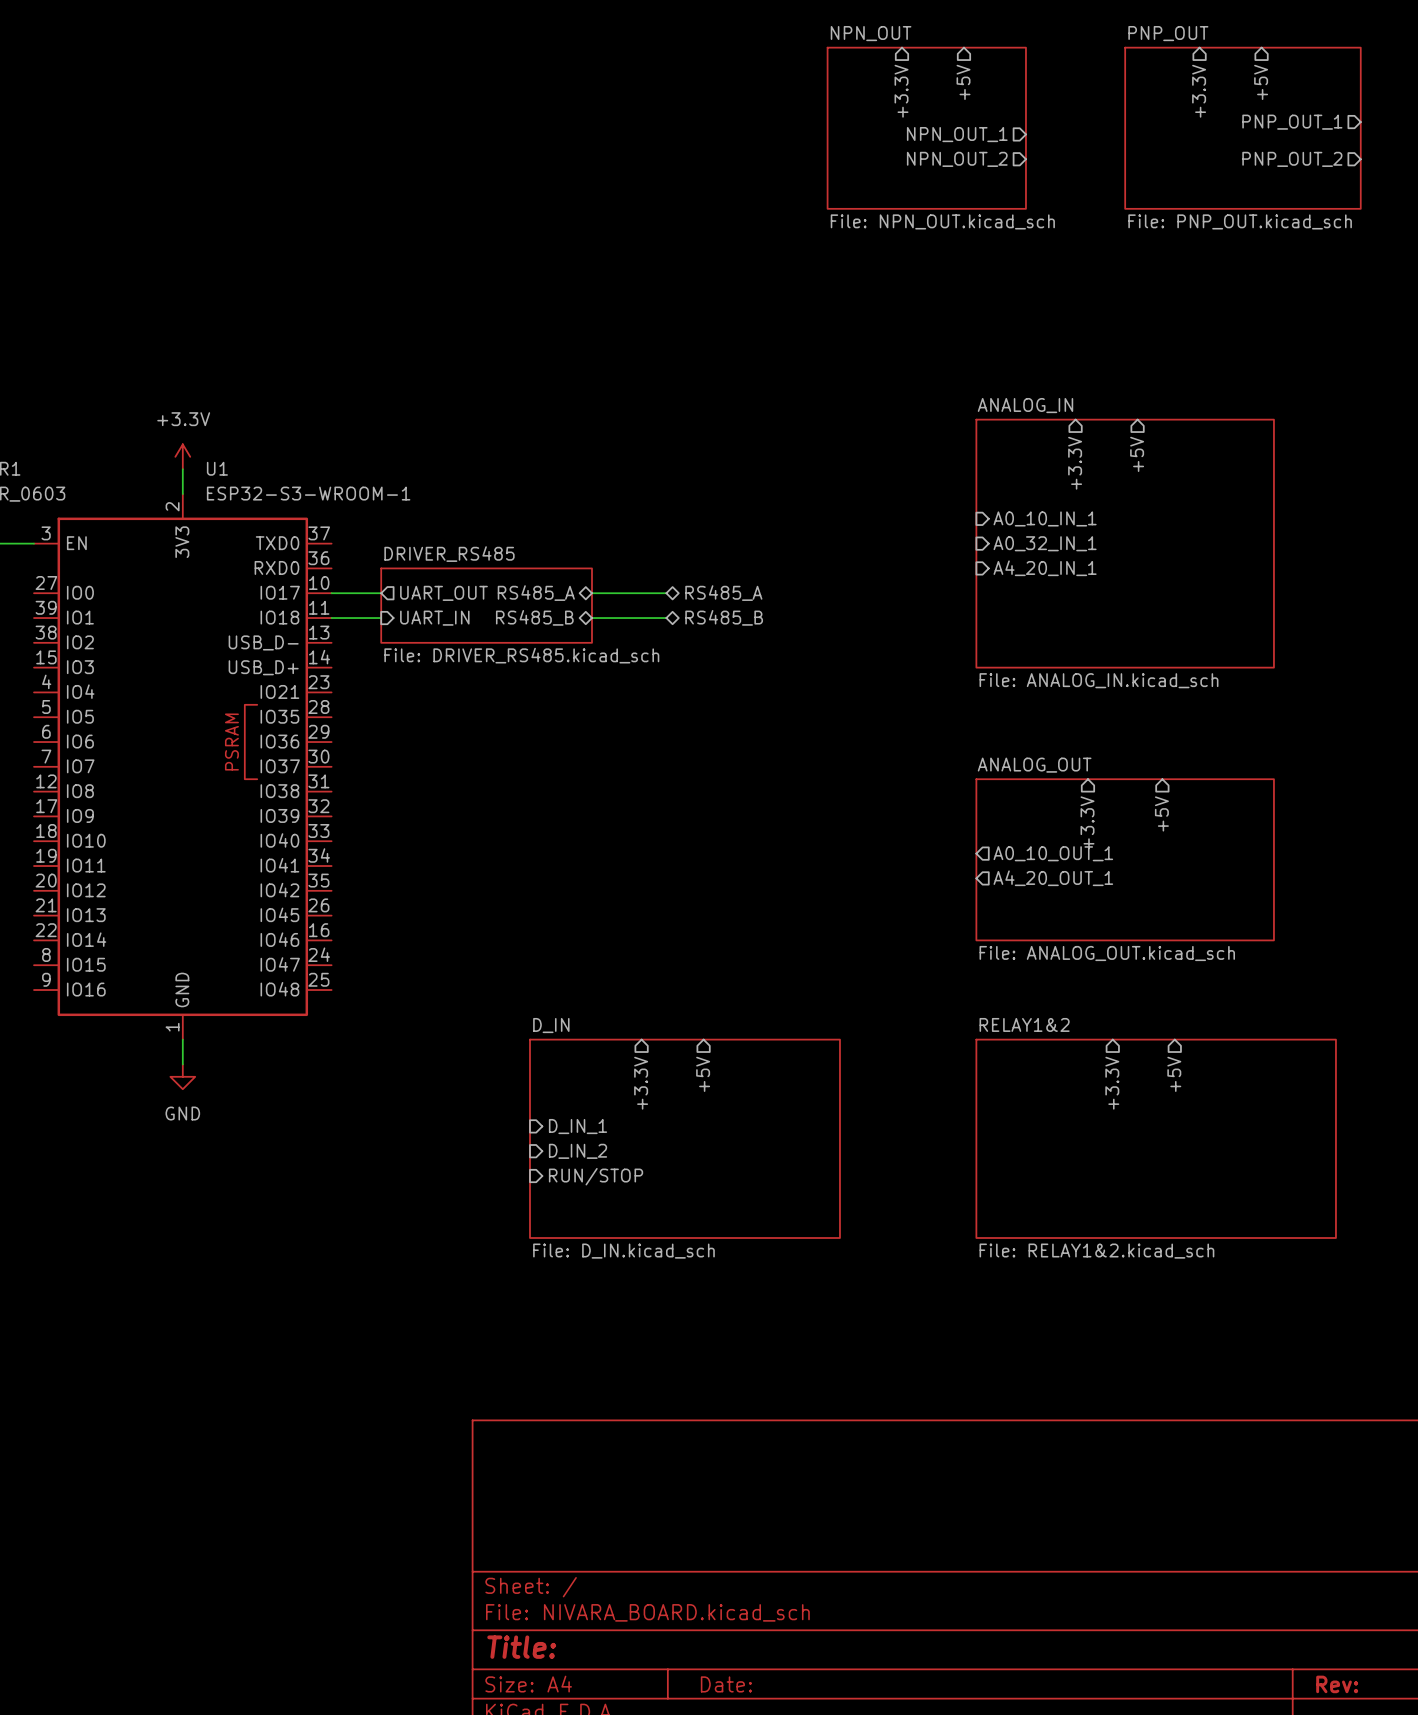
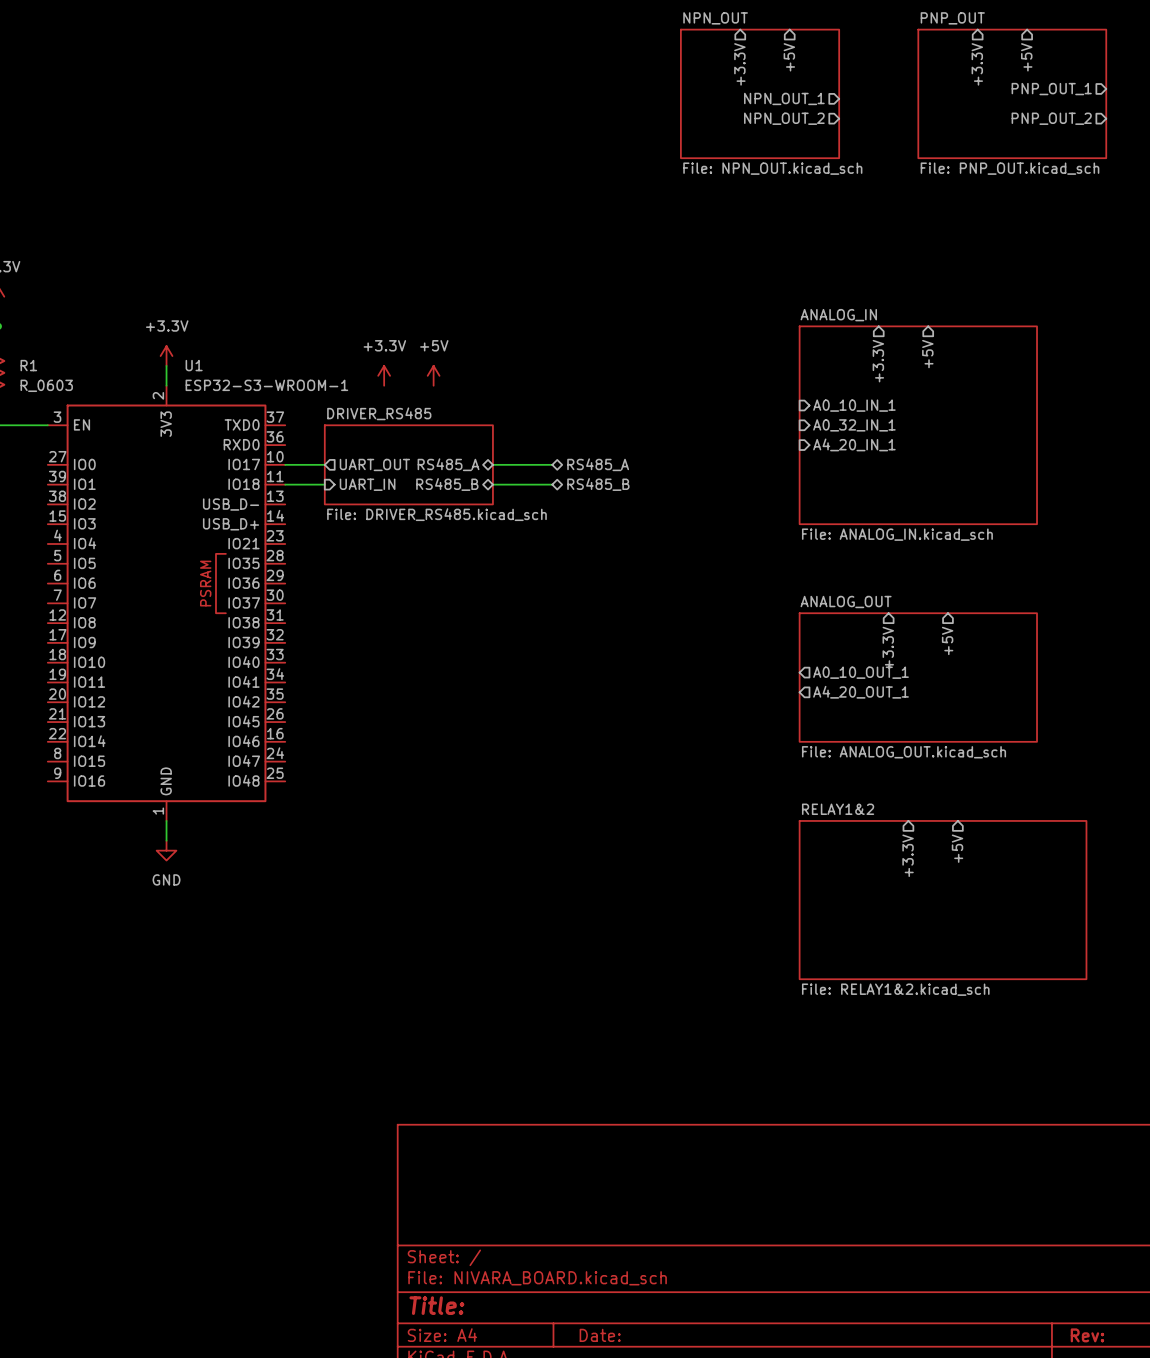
power symbol: none -> +3.3V (384, 375)
power symbol: none -> +5V (433, 375)
sheet DRIVER_RS485 shape: [380, 567, 593, 644] -> [324, 424, 494, 506]
sheet pin: +5V (703, 1074) -> none
sheet pin: +3.3V (641, 1083) -> none
sheet pin: D_IN_1 (578, 1126) -> none
sheet D_IN: File: D_IN.kicad_sch (684, 1138) -> none
sheet pin: D_IN_2 (578, 1151) -> none
sheet pin: RUN/STOP (596, 1176) -> none

